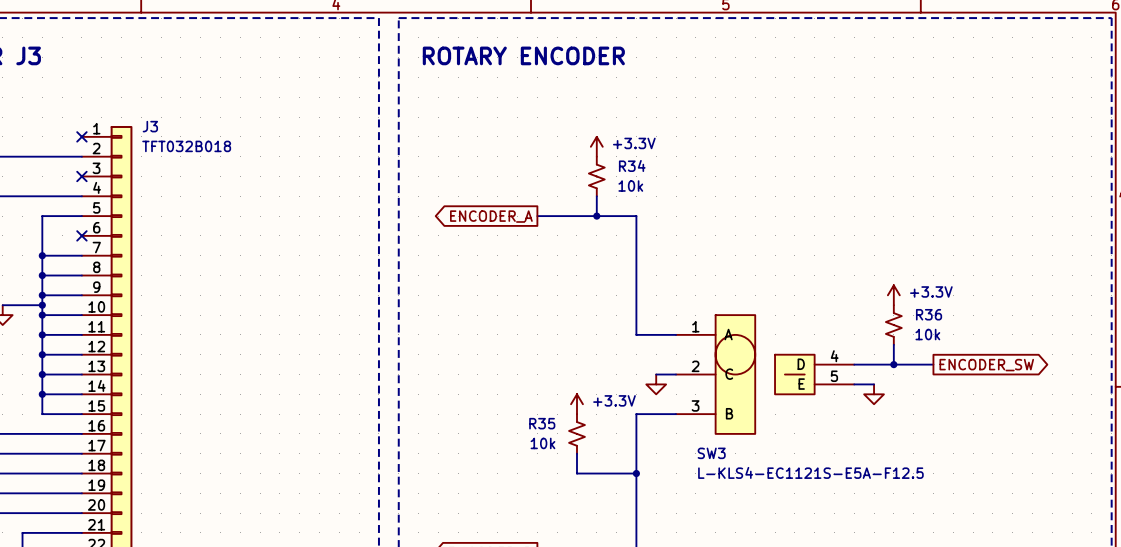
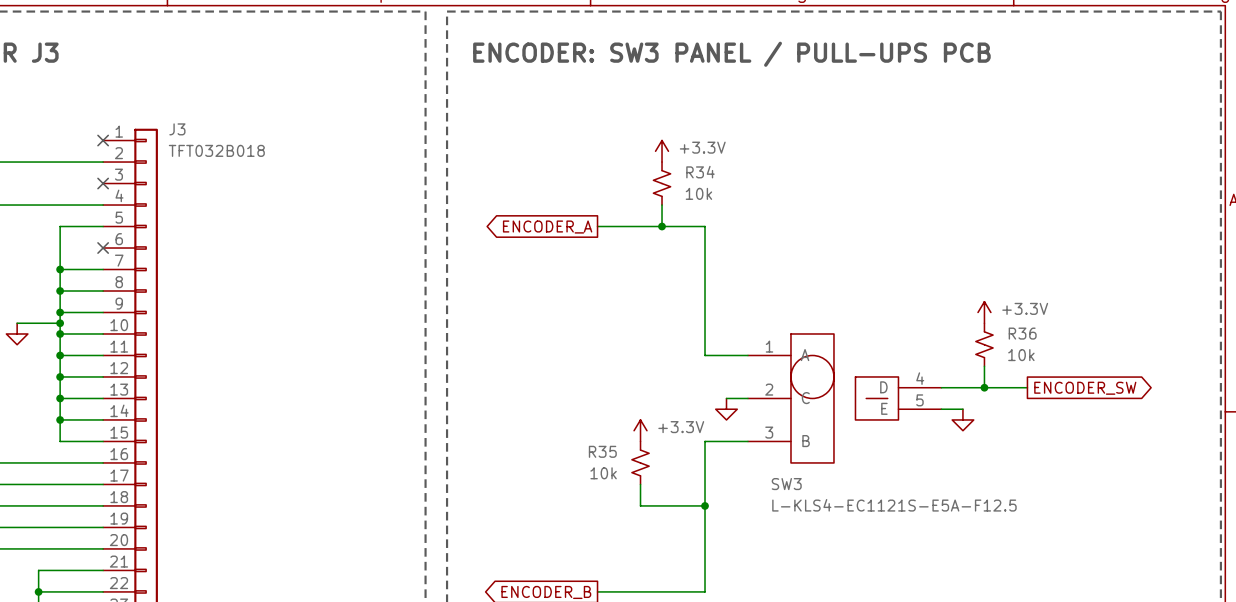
text: ROTARY ENCODER (523, 55) -> ENCODER: SW3 PANEL / PULL-UPS PCB (731, 54)

